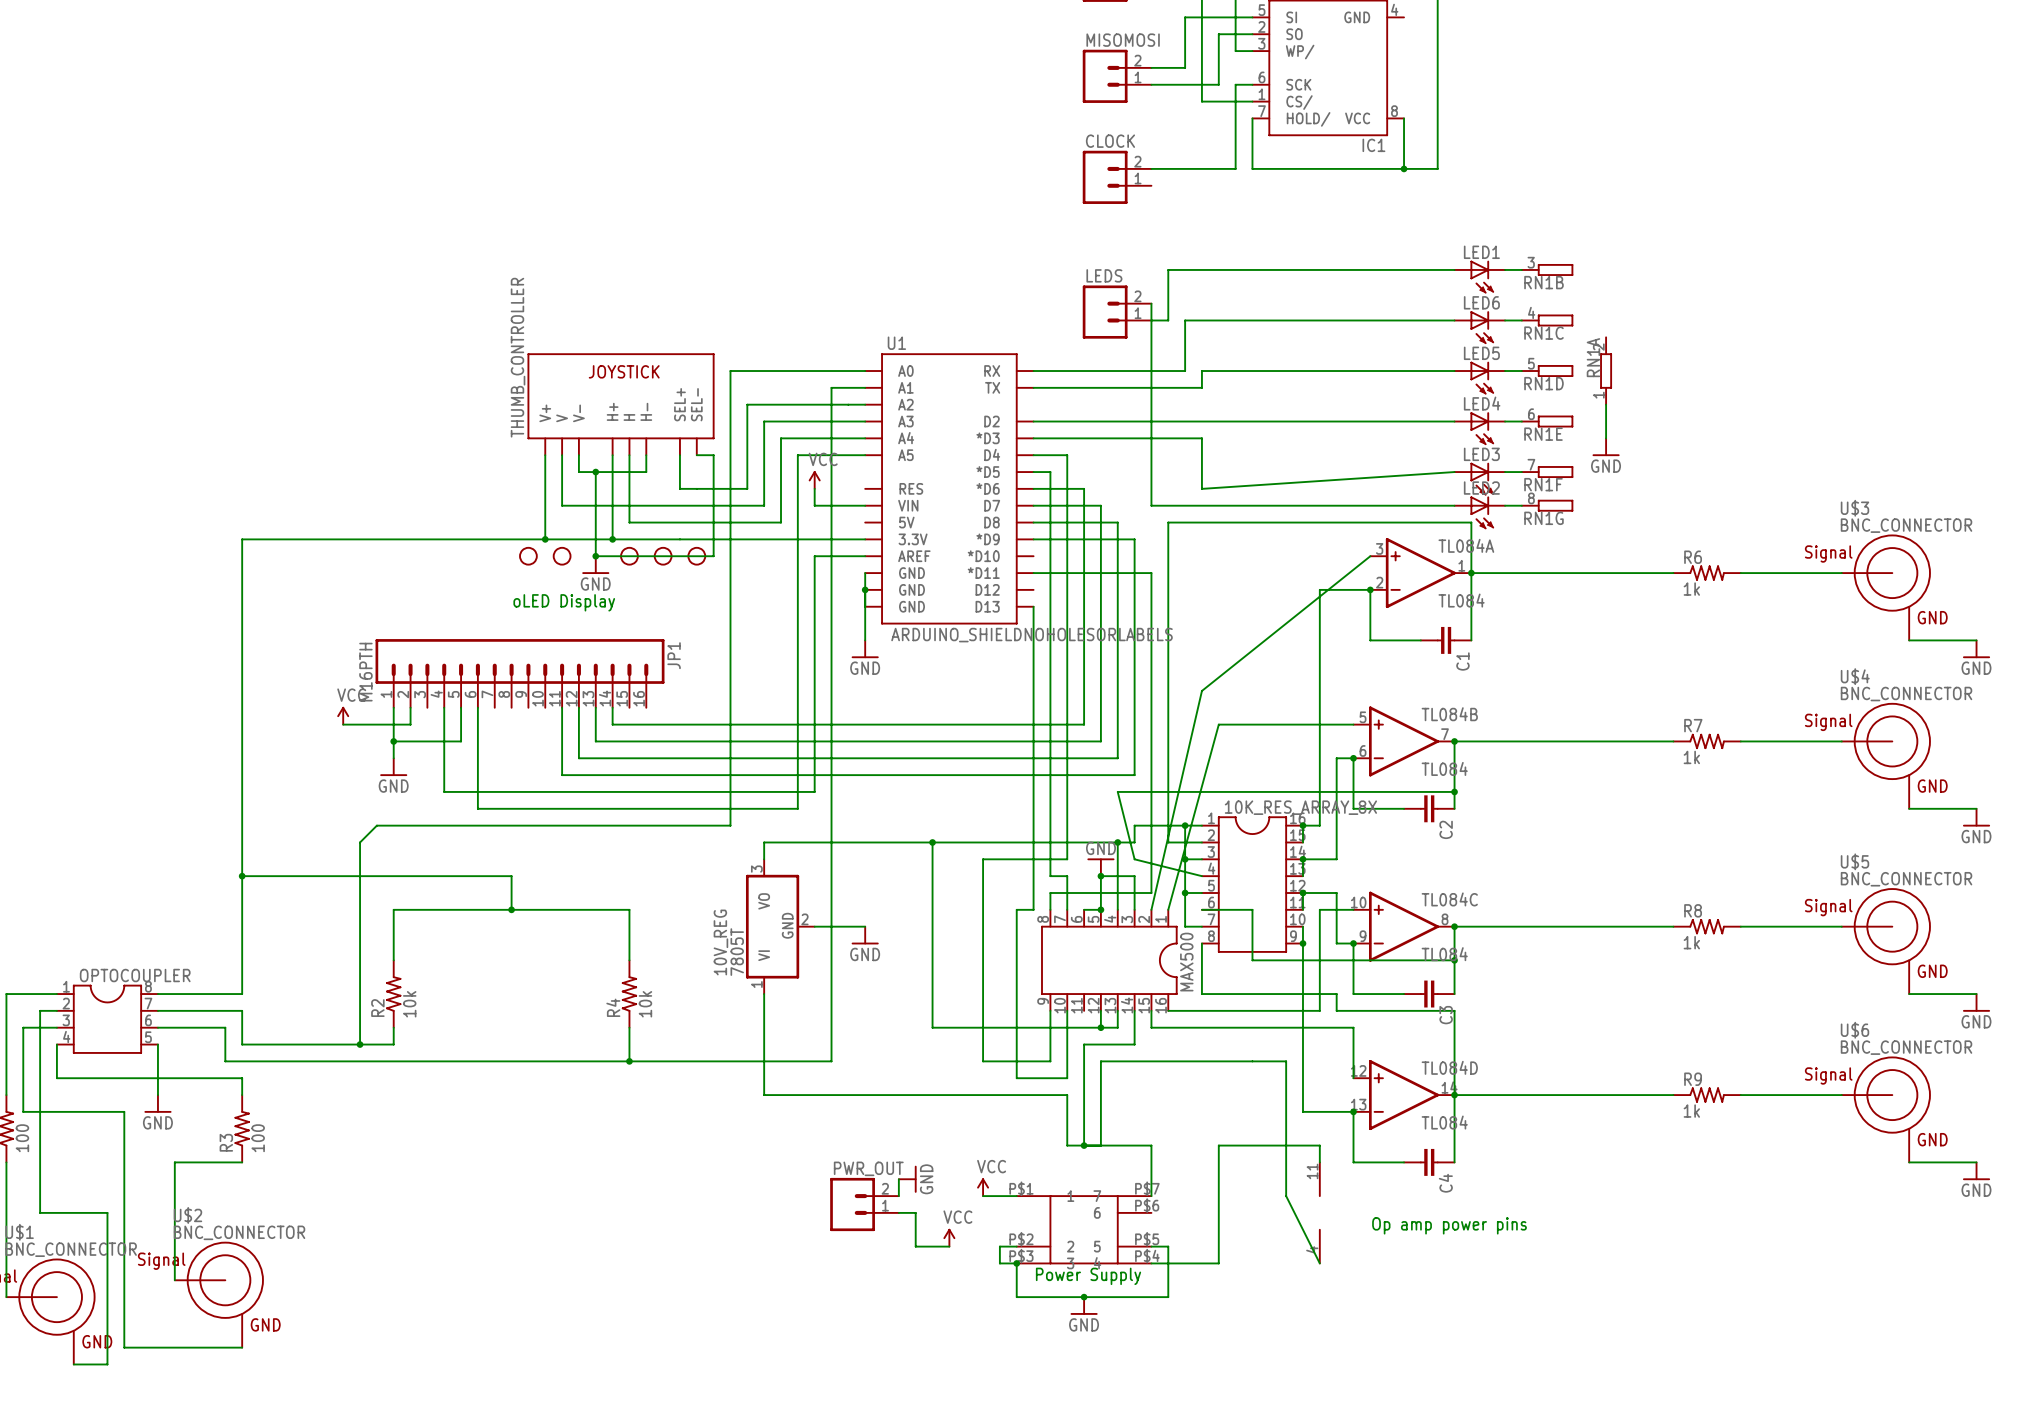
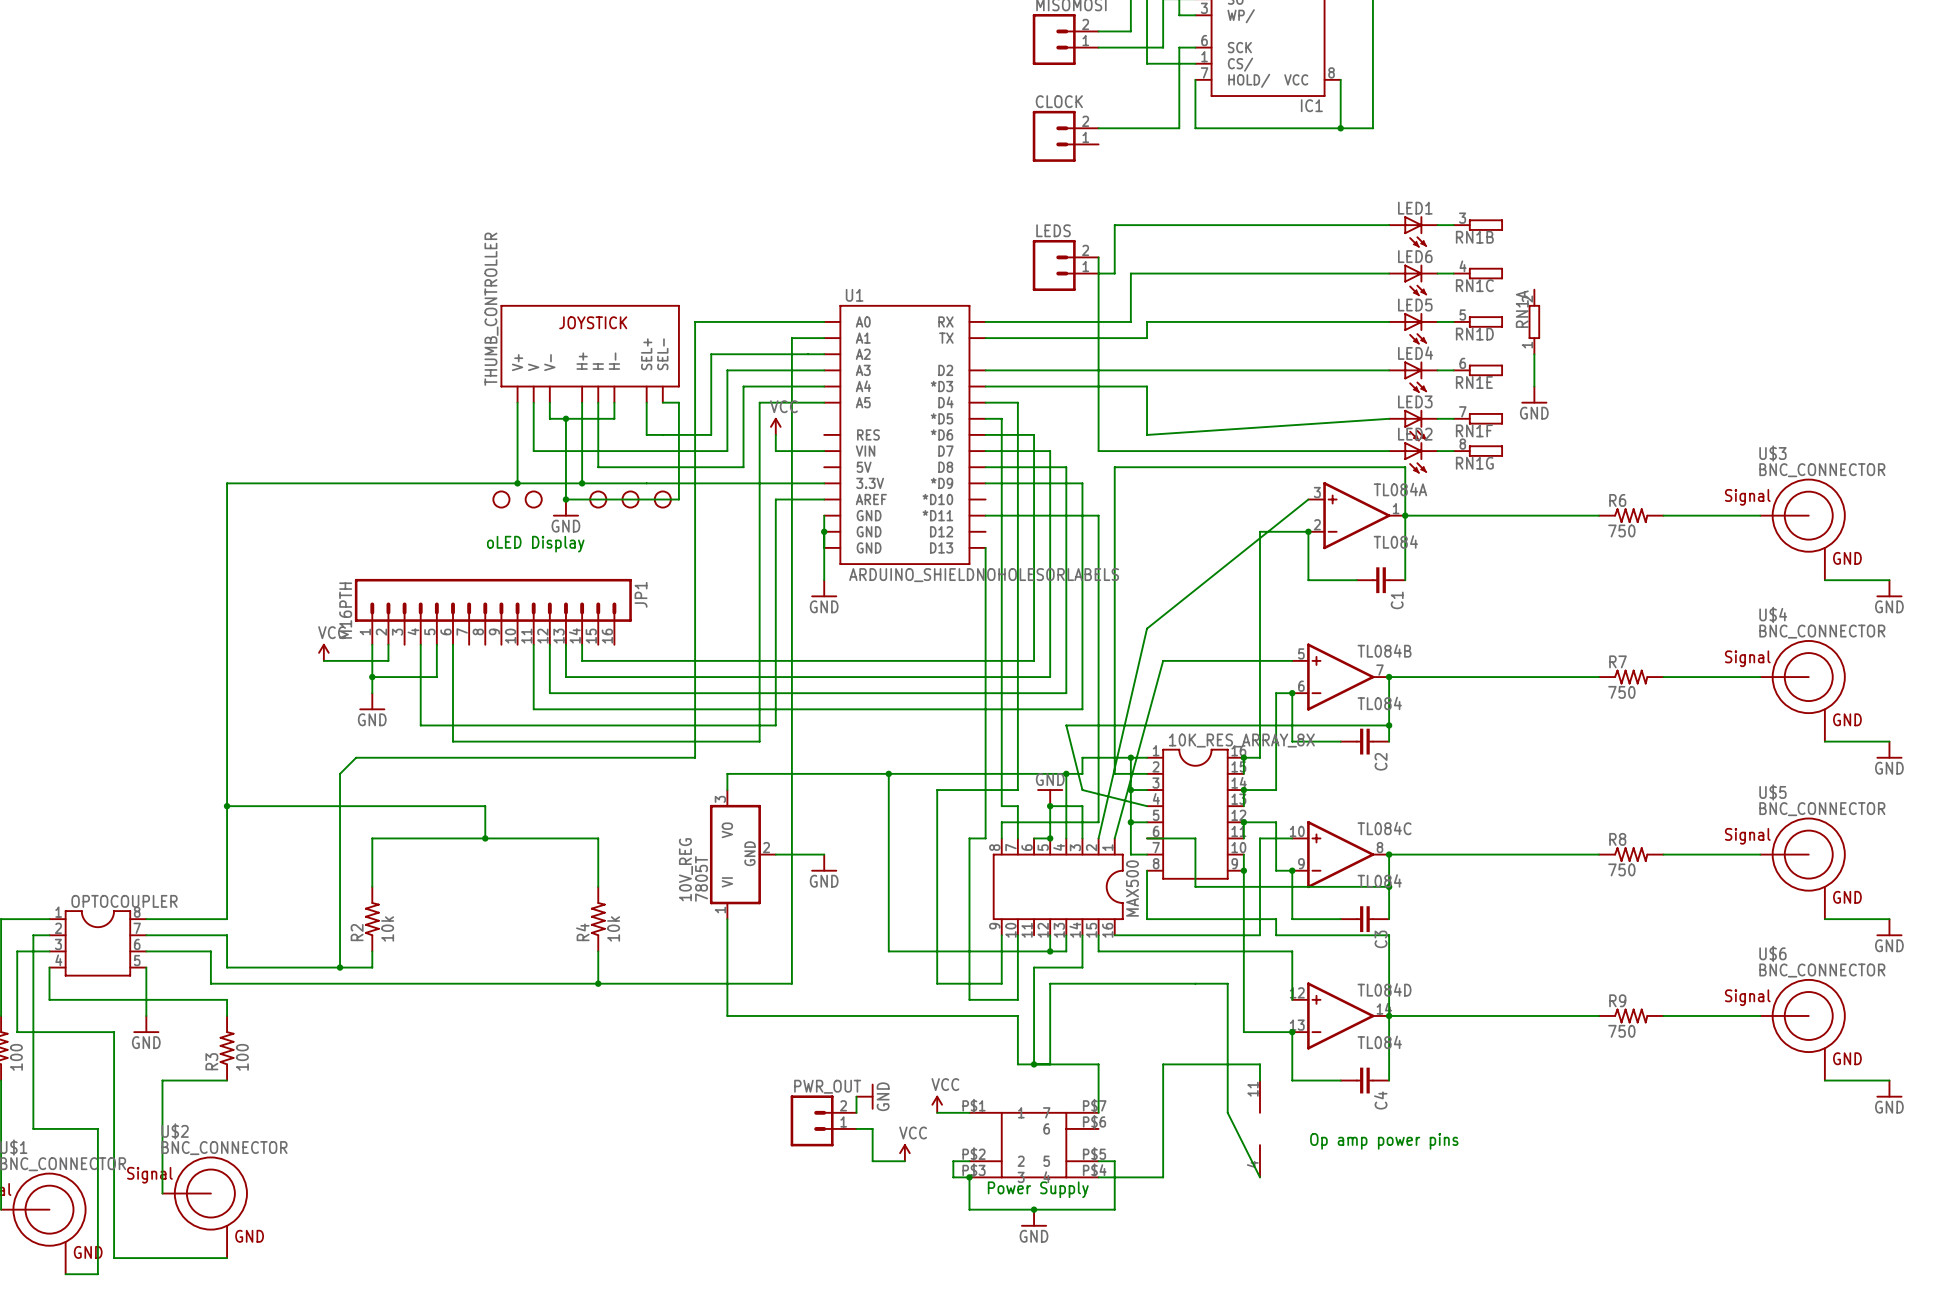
R6 value: 1k (1691, 589) -> 750 (1621, 530)
R7 value: 1k (1691, 757) -> 750 (1621, 692)
R8 value: 1k (1691, 942) -> 750 (1621, 869)
R9 value: 1k (1691, 1111) -> 750 (1621, 1031)

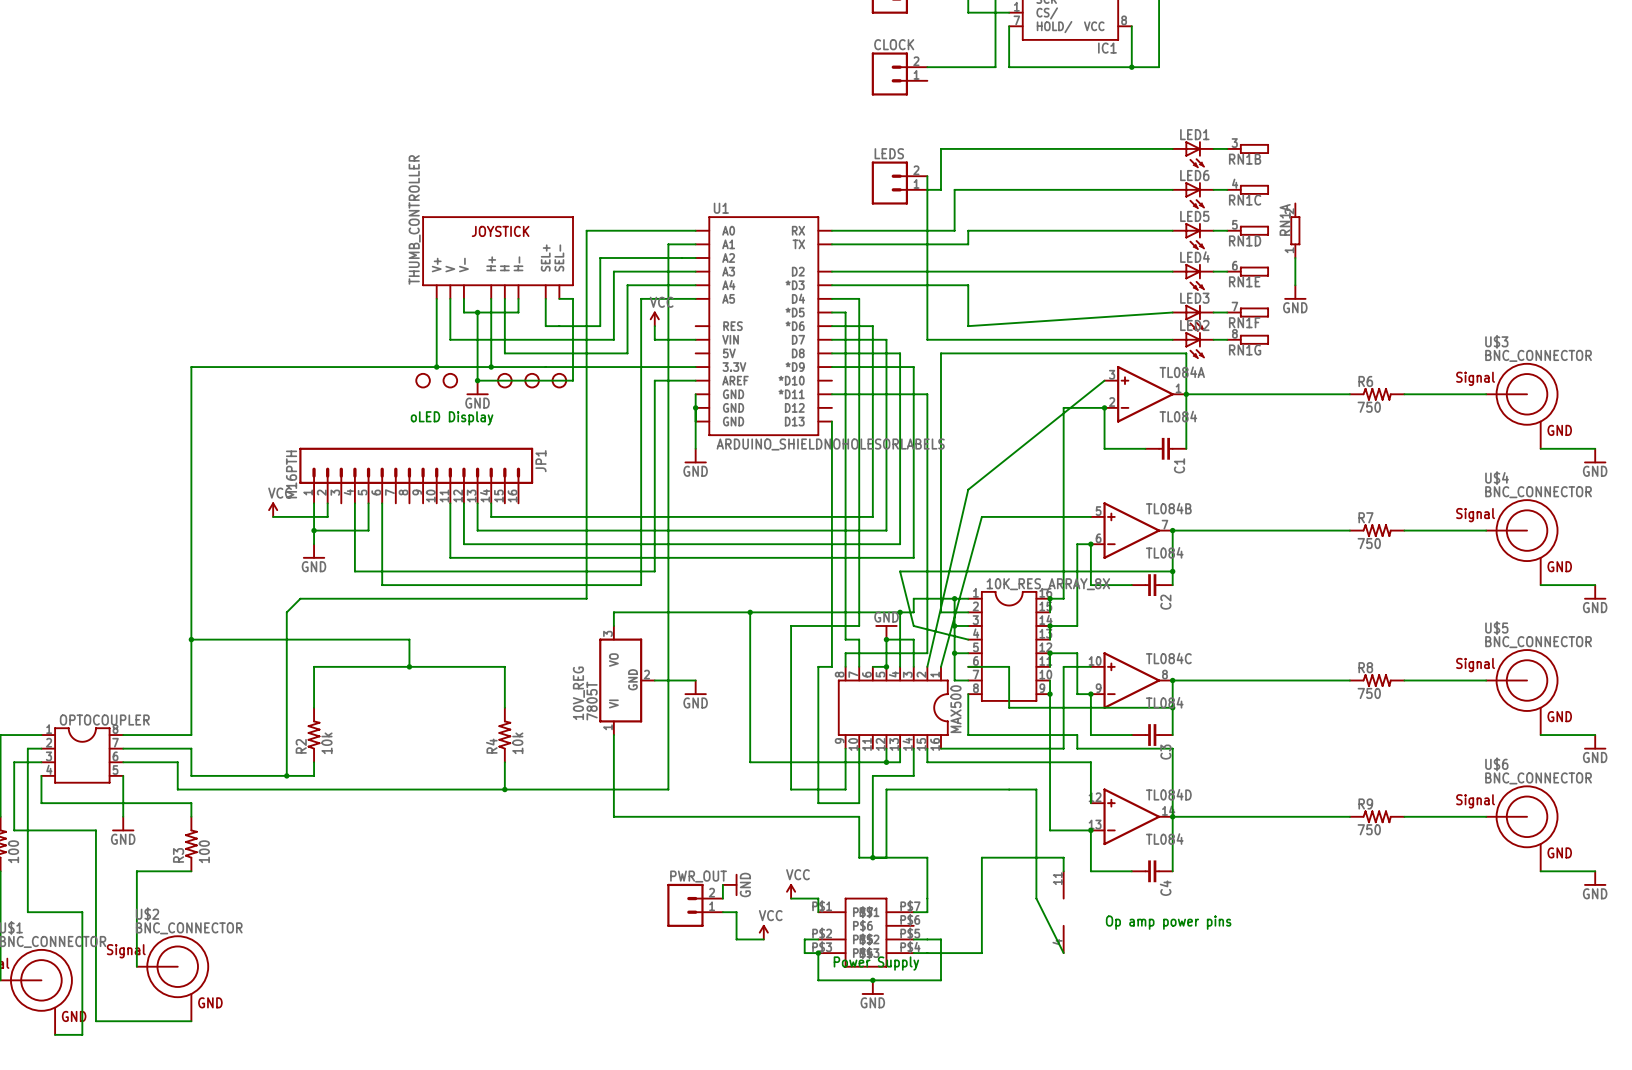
wire: none -> (818, 898) (818, 912)
part: (1034, 1145) -> none
part: none -> (866, 932)

